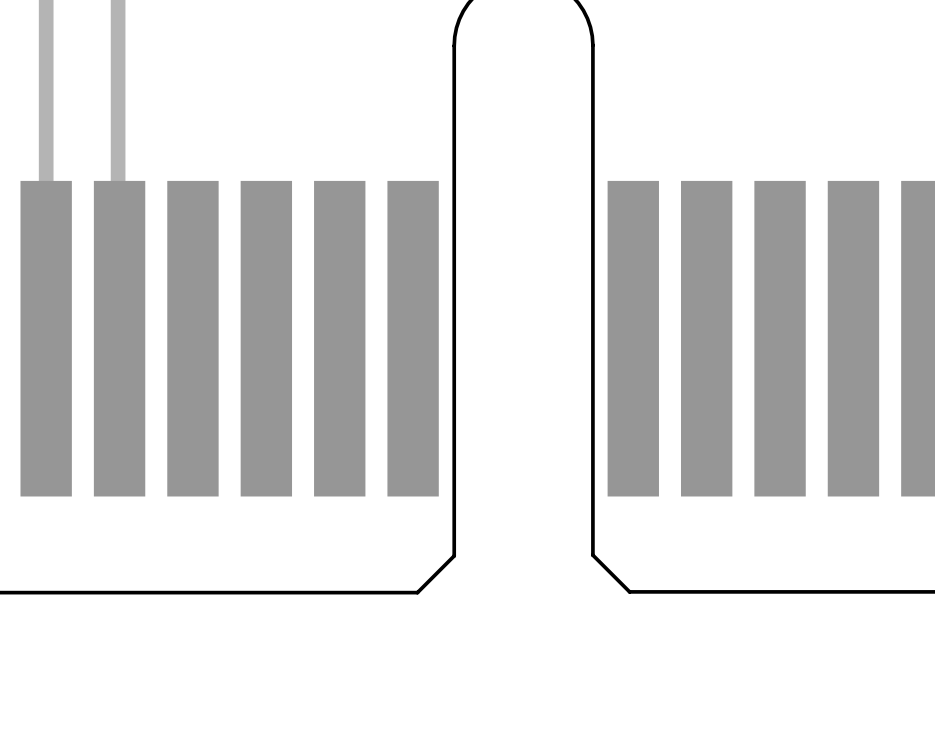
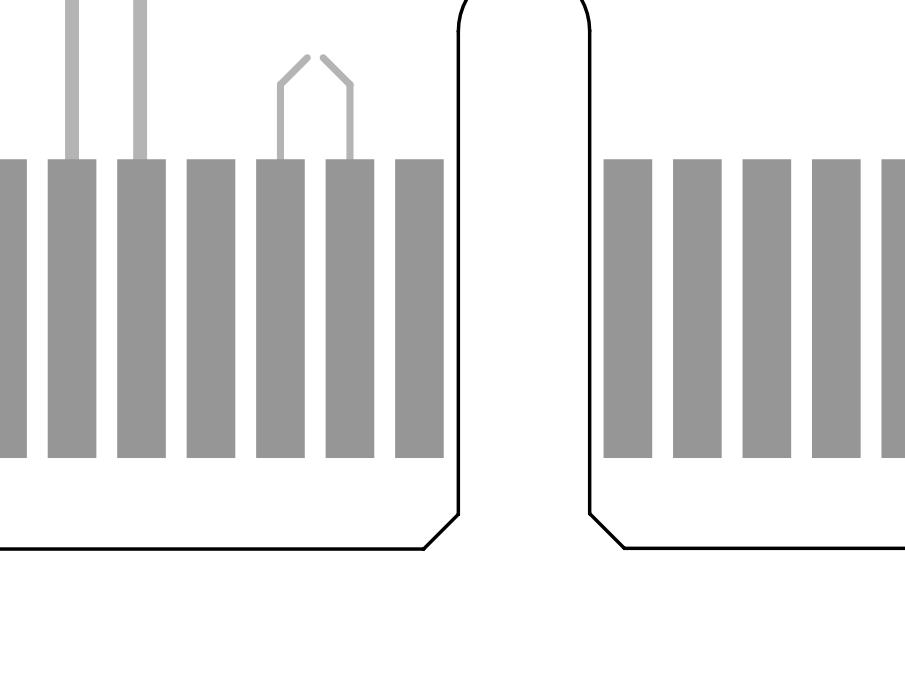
track: none -> (307, 57) (280, 84) (280, 308)
track: none -> (323, 57) (349, 84) (349, 308)

